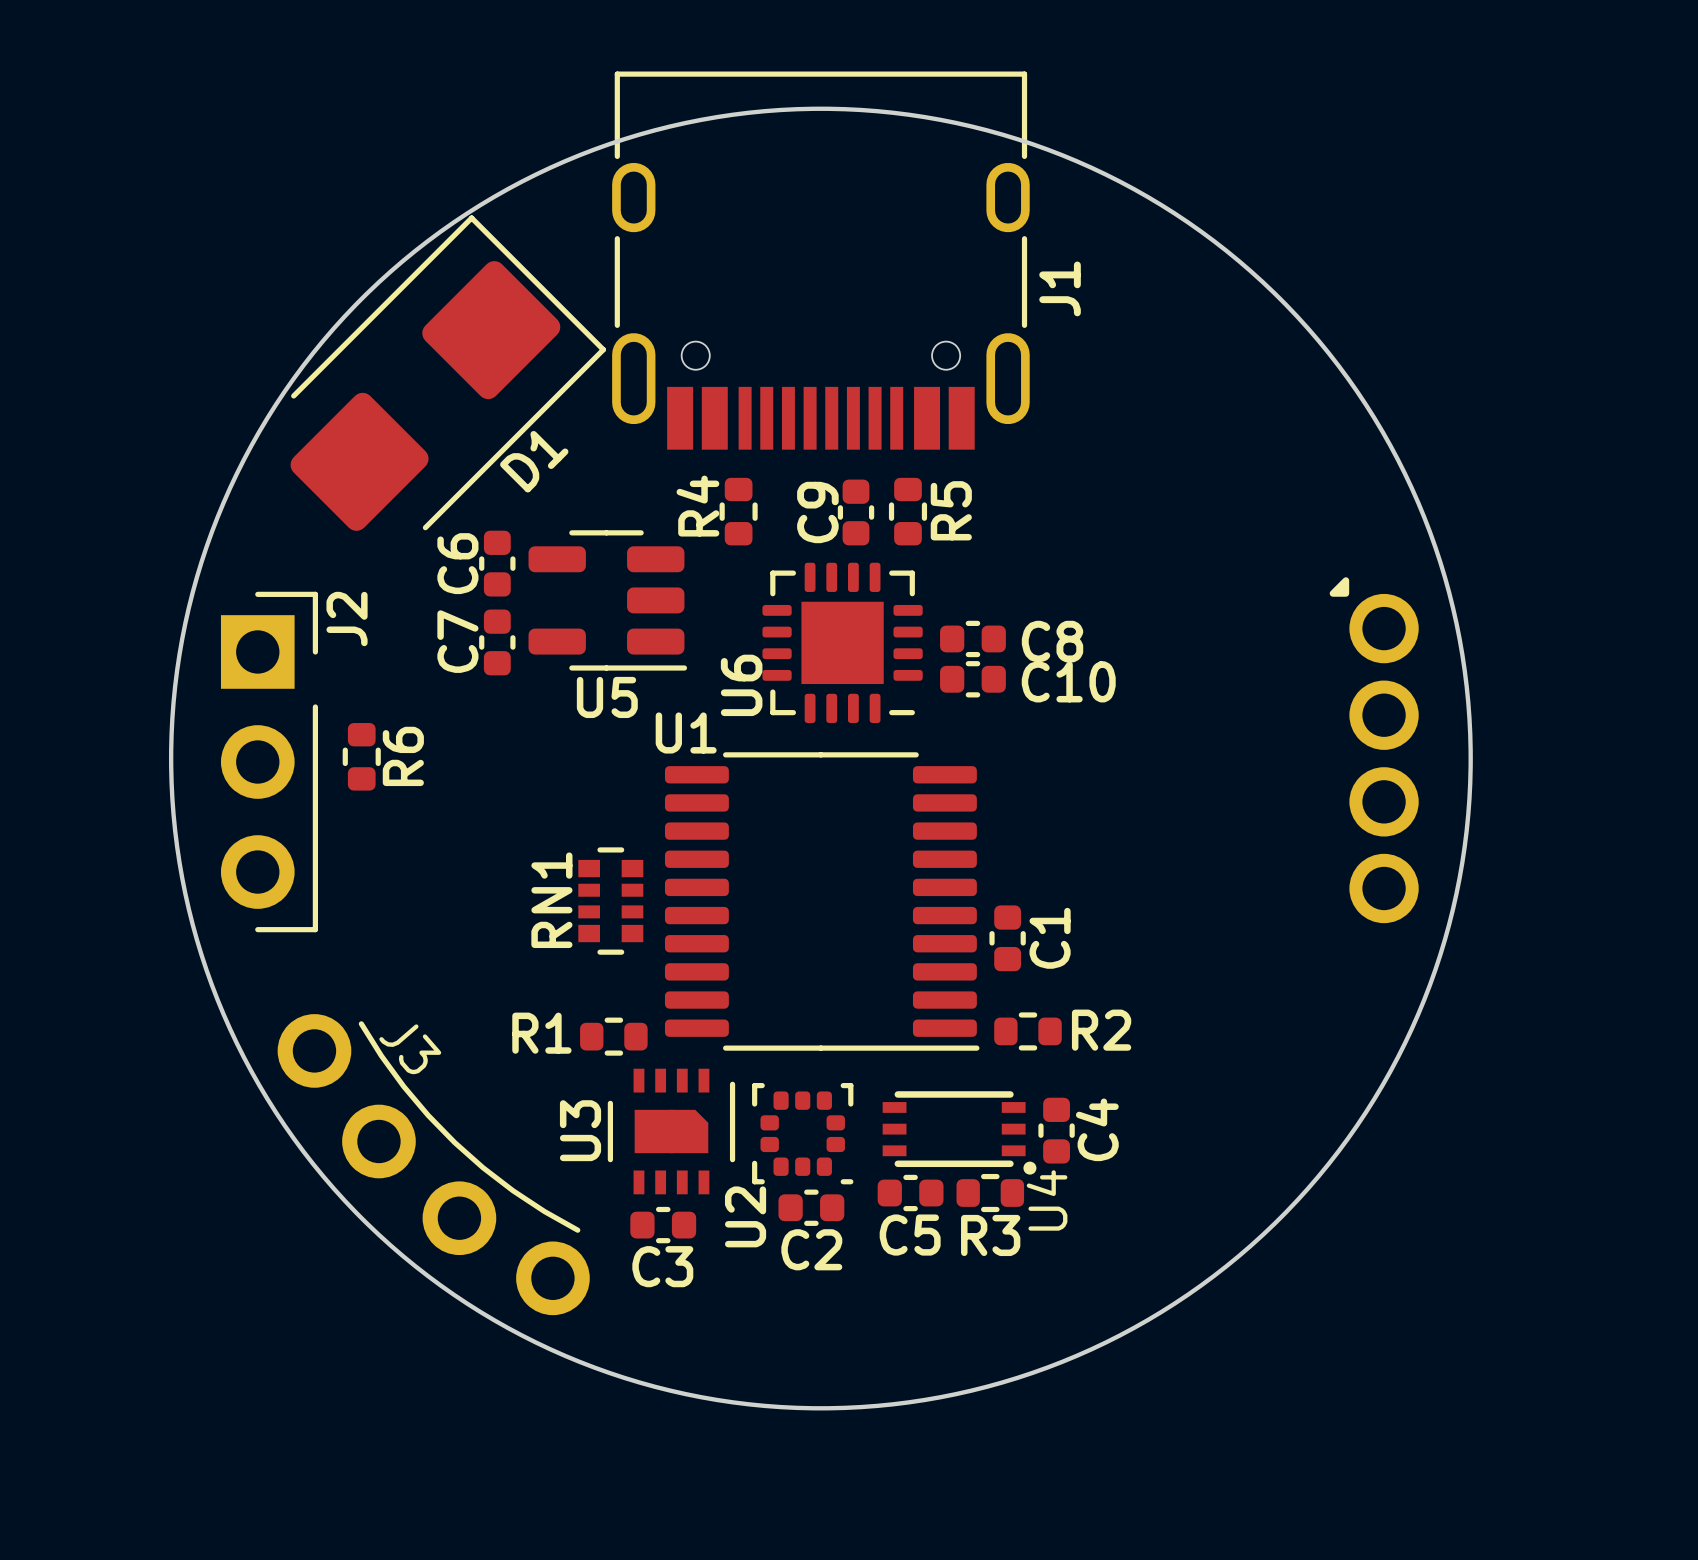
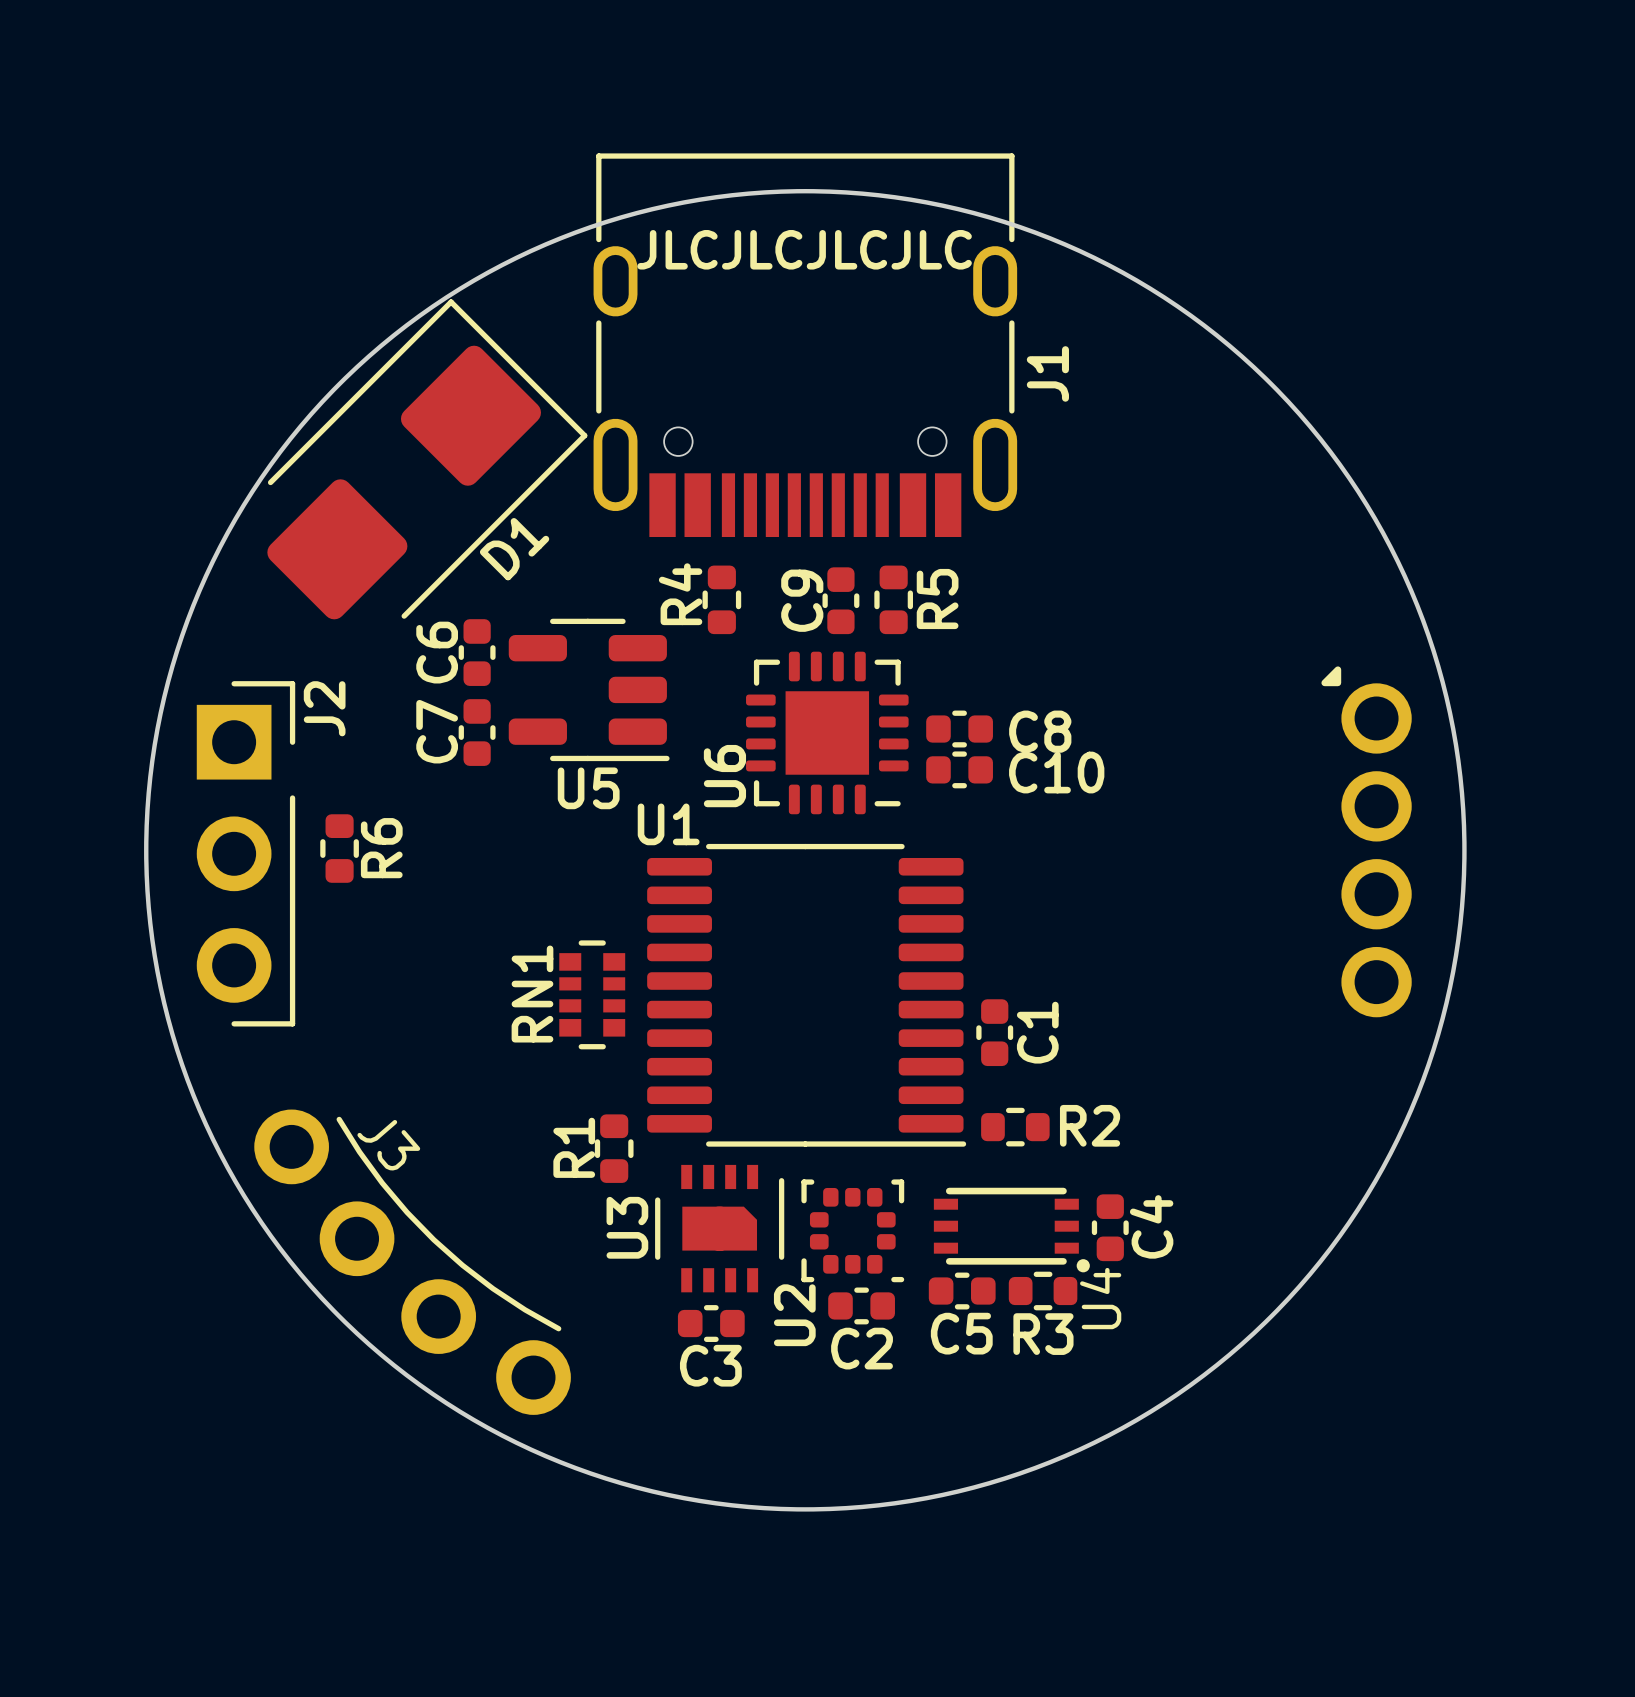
text: none -> JLCJLCJLCJLC (804, 249)
R1 rotation: 0° (613, 1036) -> 90° clockwise (614, 1148)
C4 position: (1056, 1130) -> (1110, 1227)
U3 position: (671, 1131) -> (719, 1228)
U4 position: (959, 1132) -> (1011, 1230)
U2 position: (802, 1133) -> (852, 1230)
C5 position: (910, 1193) -> (962, 1291)
R3 position: (990, 1193) -> (1043, 1291)
C2 position: (811, 1207) -> (861, 1305)
C3 position: (663, 1225) -> (711, 1323)

